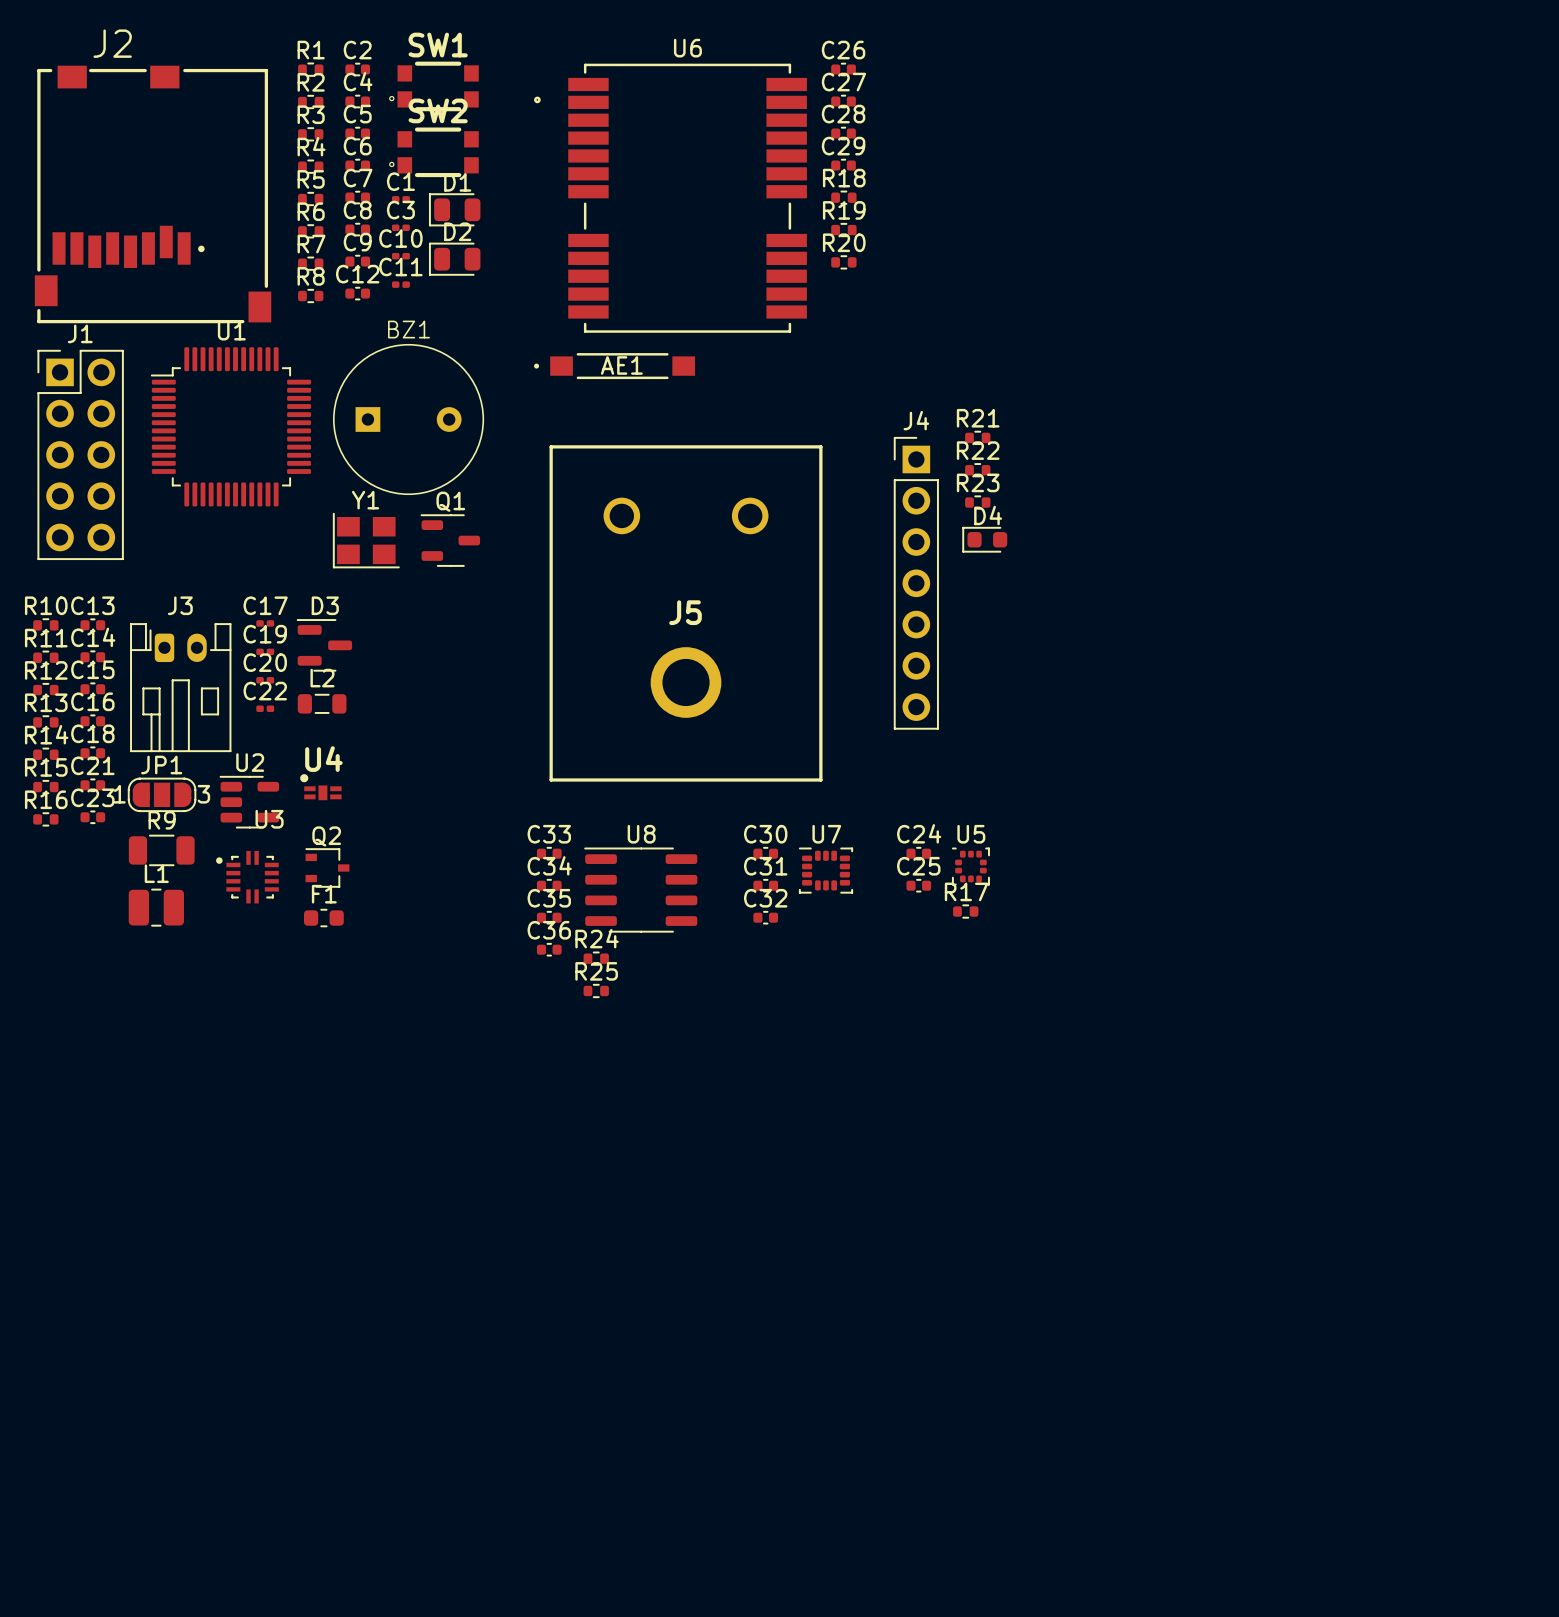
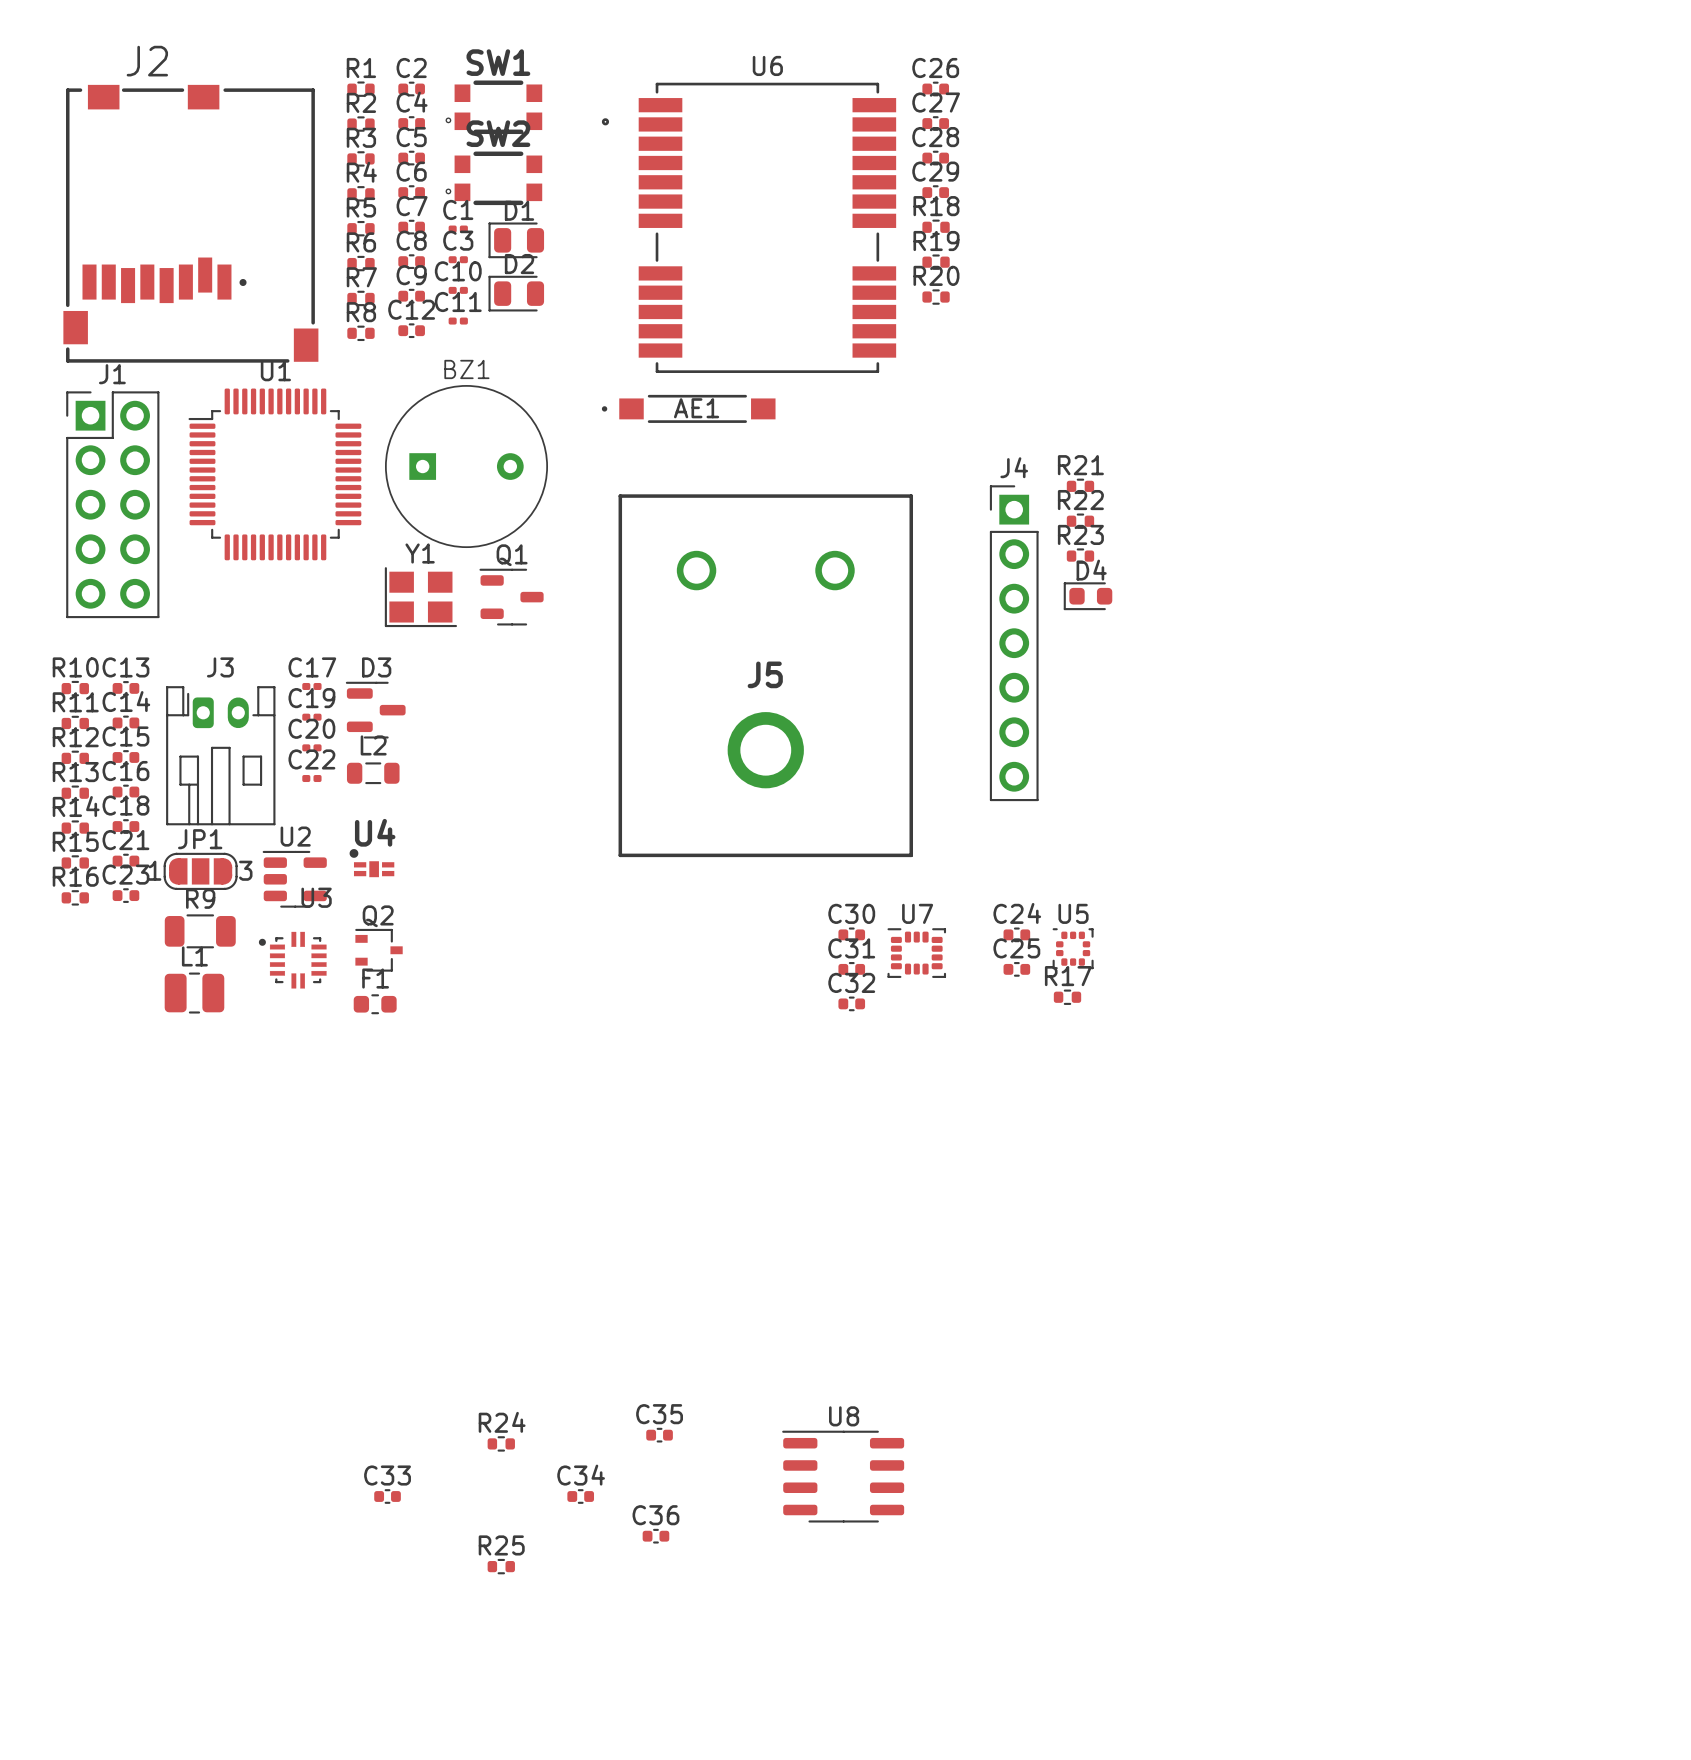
C33 position: (549, 853) -> (387, 1496)
C34 position: (549, 885) -> (580, 1496)
U8 position: (640, 890) -> (843, 1476)
C35 position: (549, 917) -> (659, 1435)
C36 position: (549, 949) -> (655, 1536)
R24 position: (596, 958) -> (501, 1443)
R25 position: (596, 990) -> (501, 1566)

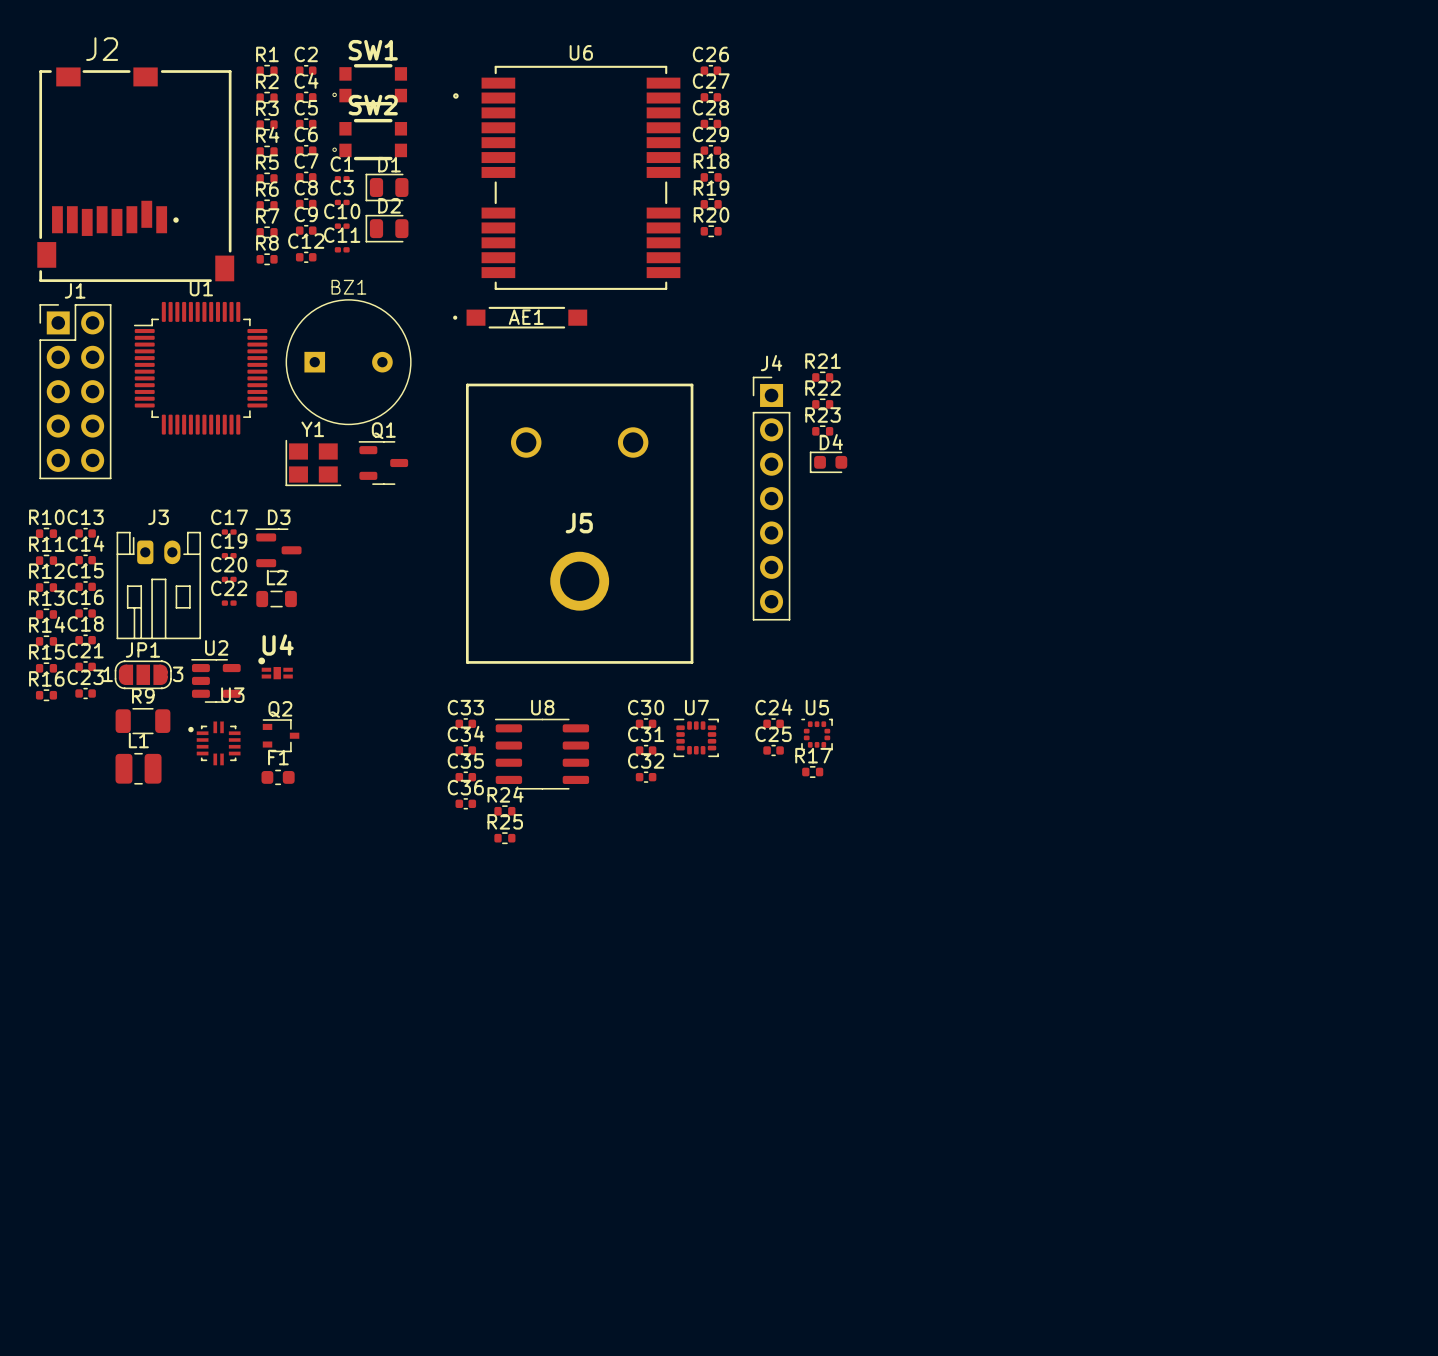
C35 position: (659, 1435) -> (465, 777)
R24 position: (501, 1443) -> (504, 811)
U8 position: (843, 1476) -> (541, 754)
C33 position: (387, 1496) -> (465, 723)
C34 position: (580, 1496) -> (465, 750)
C36 position: (655, 1536) -> (465, 803)
R25 position: (501, 1566) -> (504, 838)

